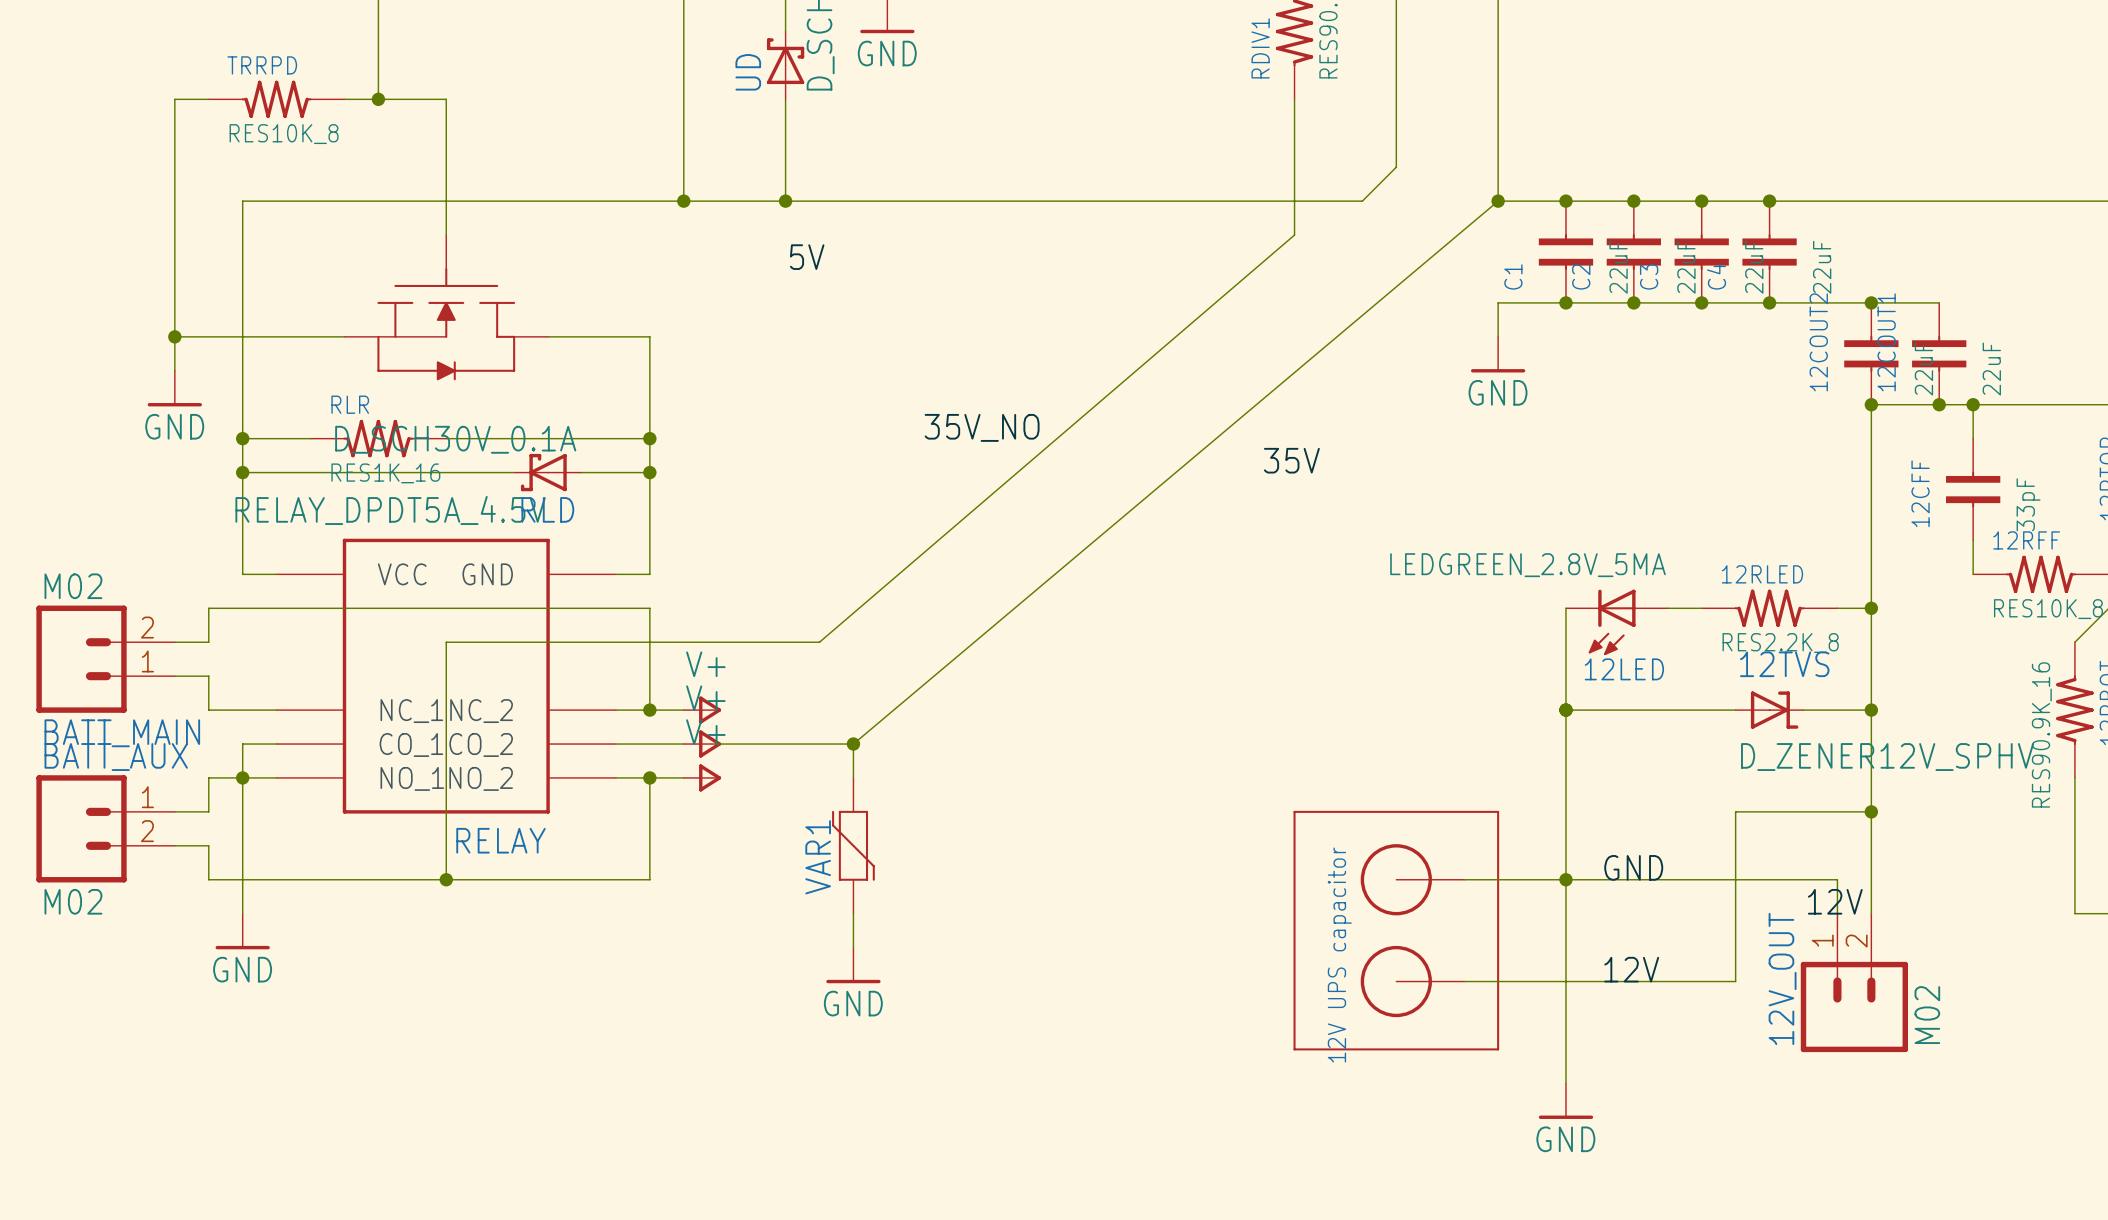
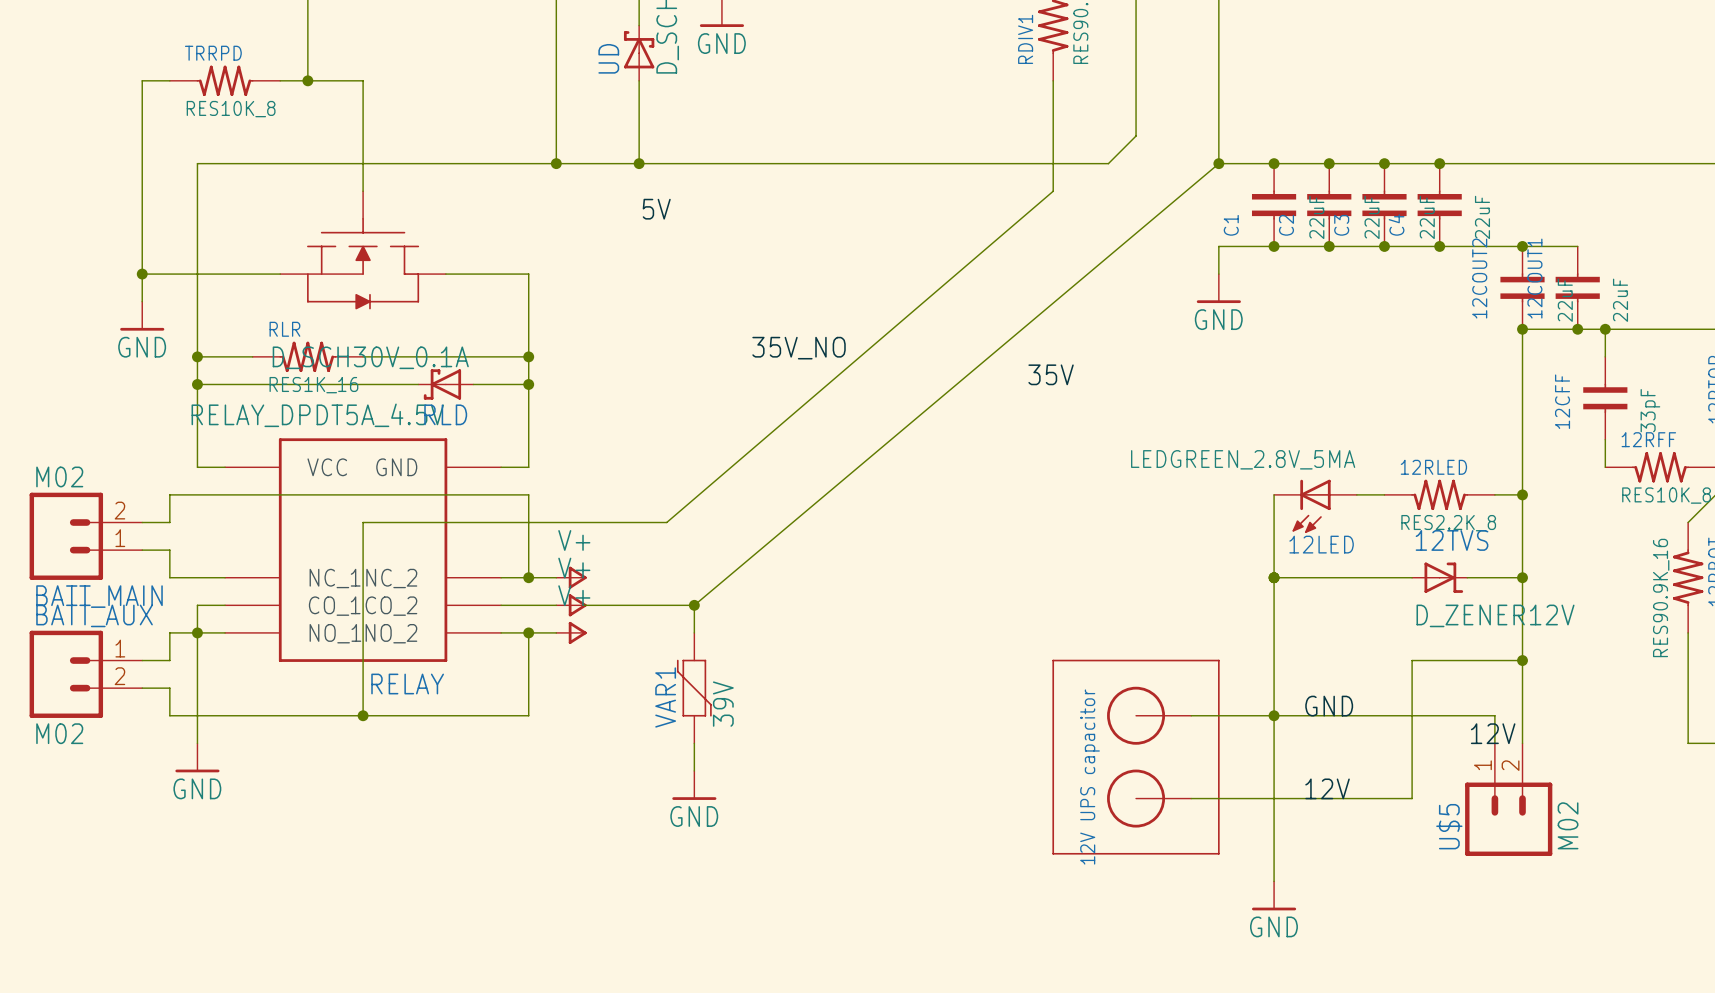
12TVS value: D_ZENER12V_SPHV (1887, 757) -> D_ZENER12V (1495, 615)
VAR1 value: none -> 39V (723, 704)
12V_OUT name: 12V_OUT (1782, 978) -> U$5 (1449, 826)

